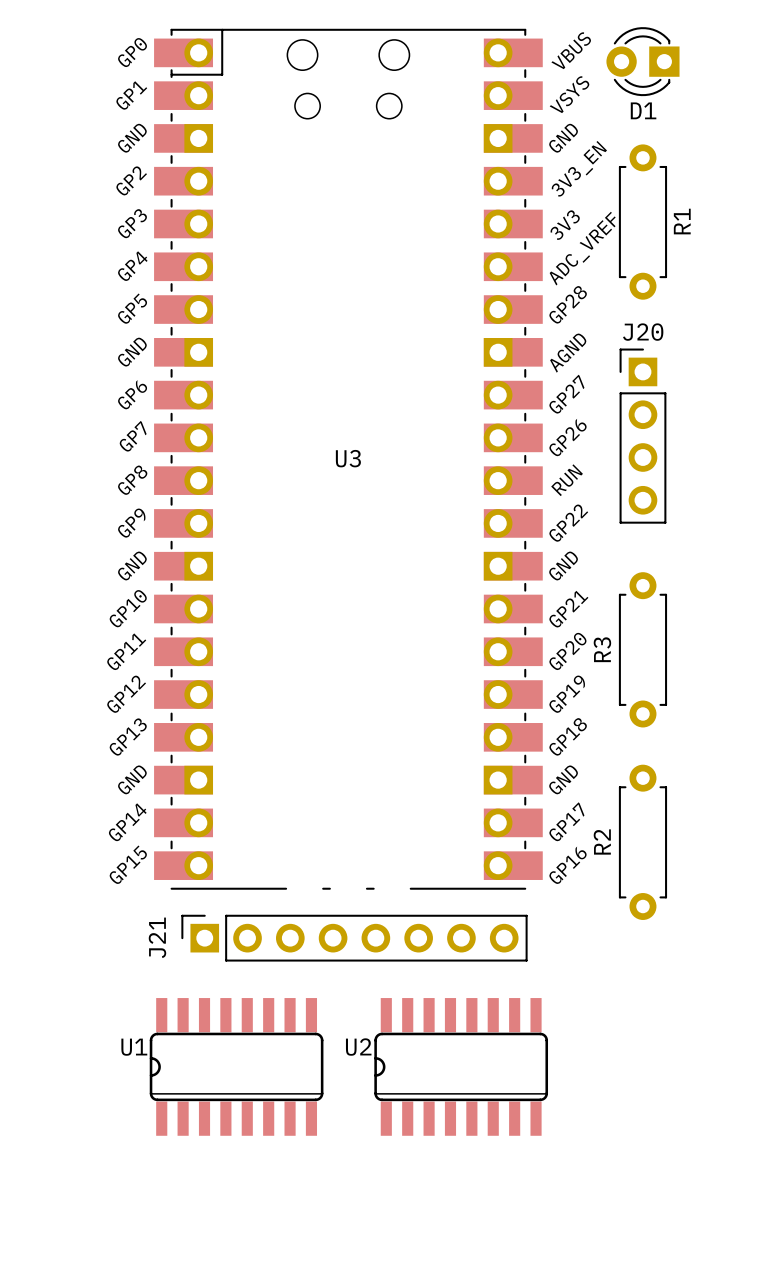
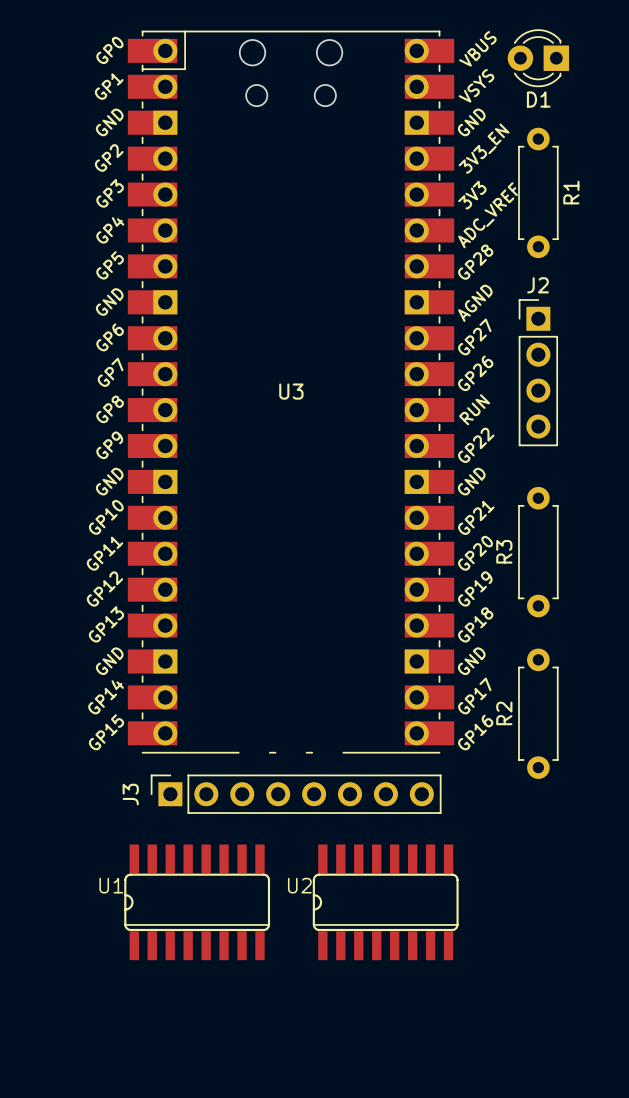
J20 name: J20 (643, 332) -> J2 (538, 285)
J21 name: J21 (157, 937) -> J3 (130, 794)

